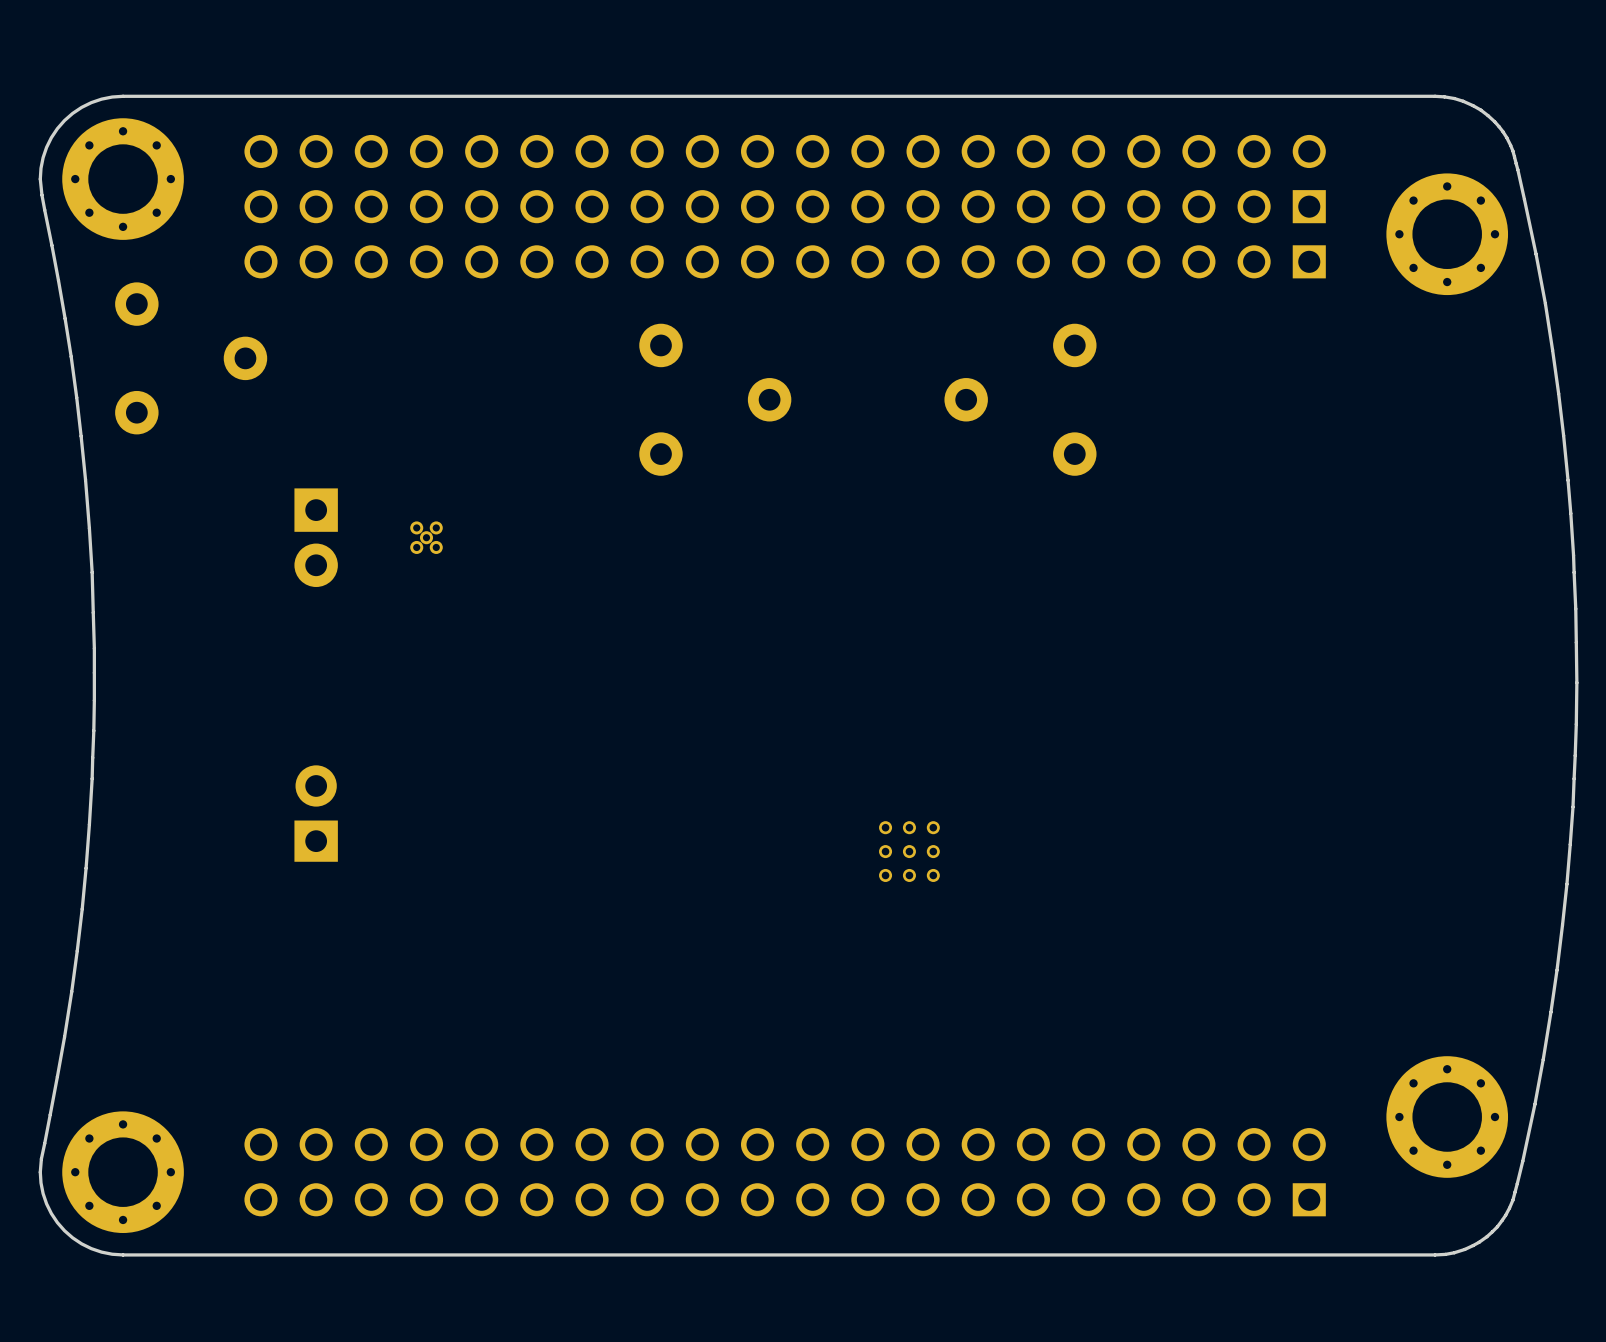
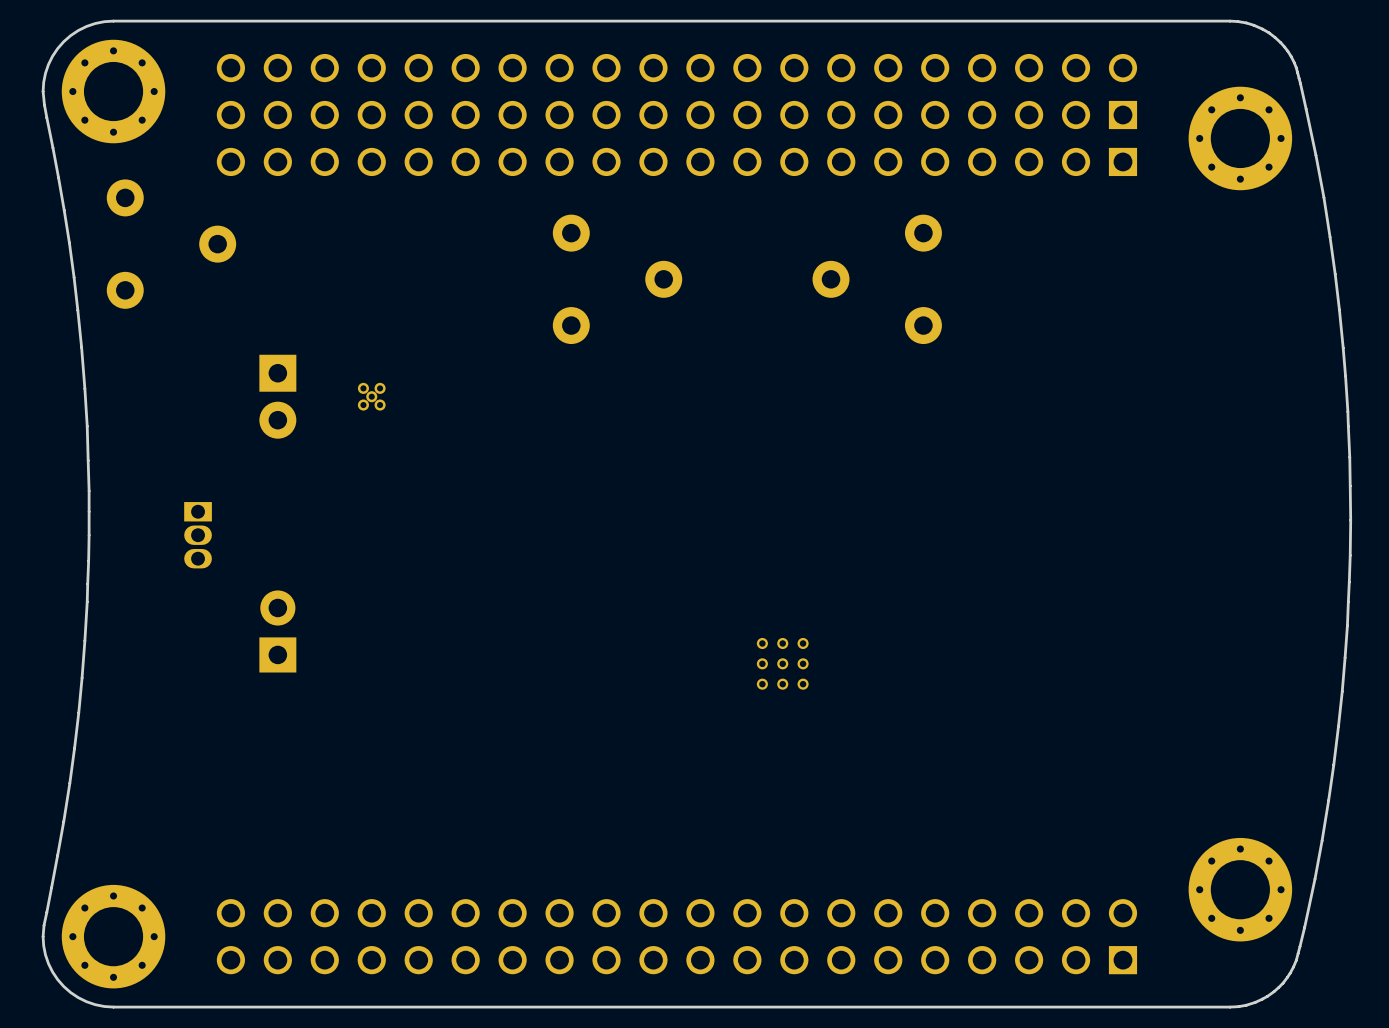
part: none -> (198, 535)

